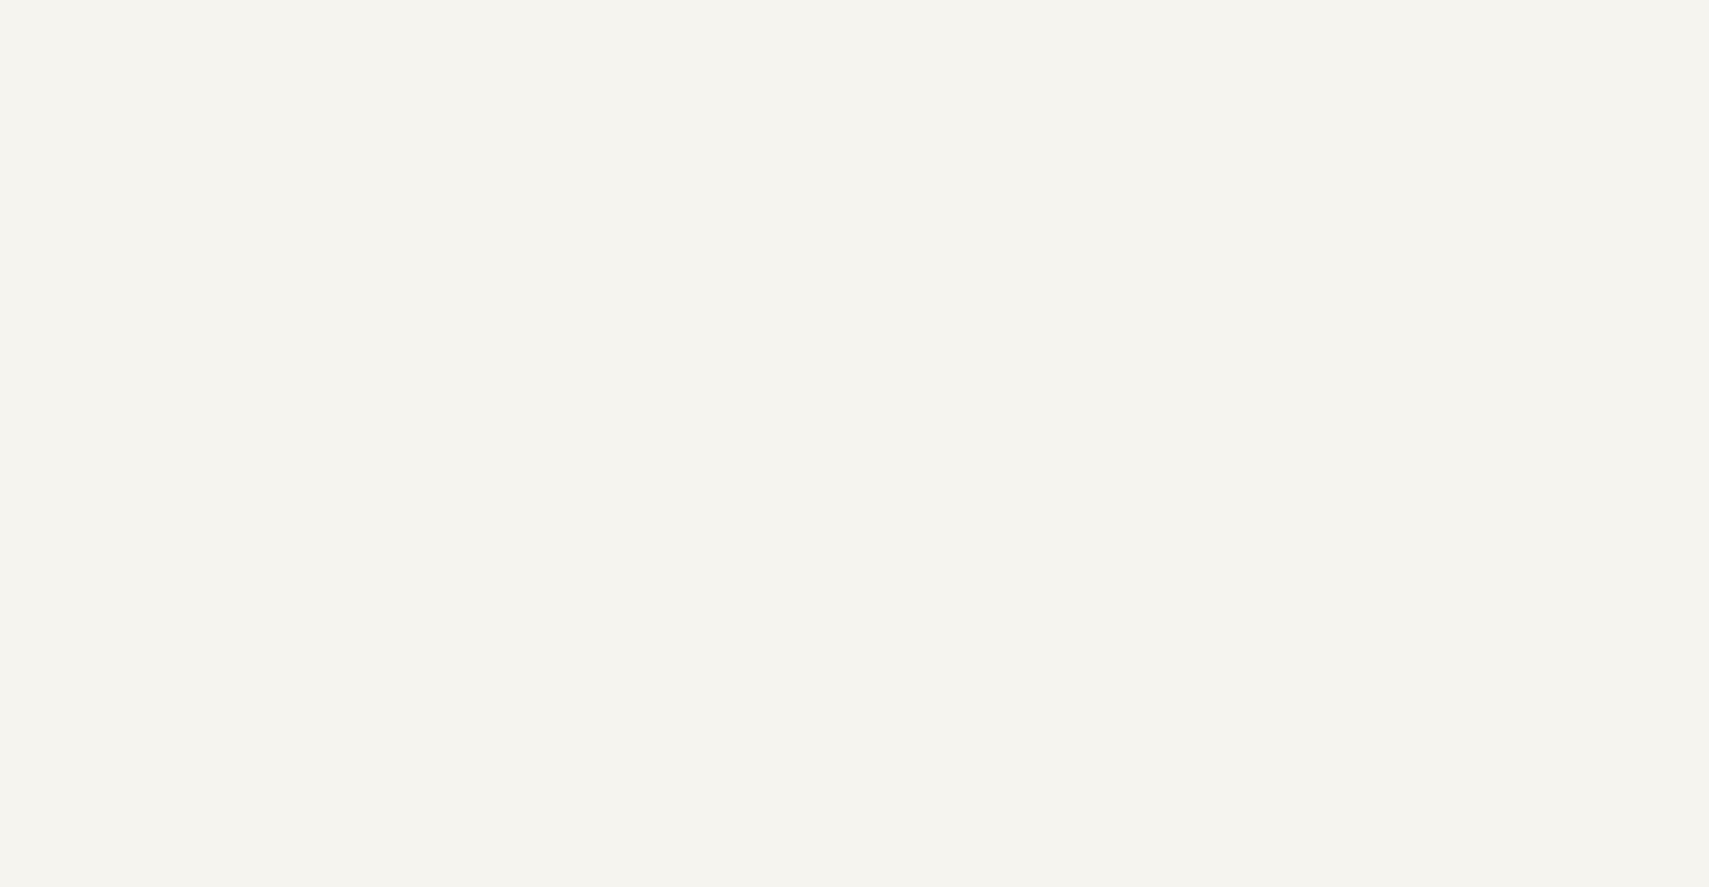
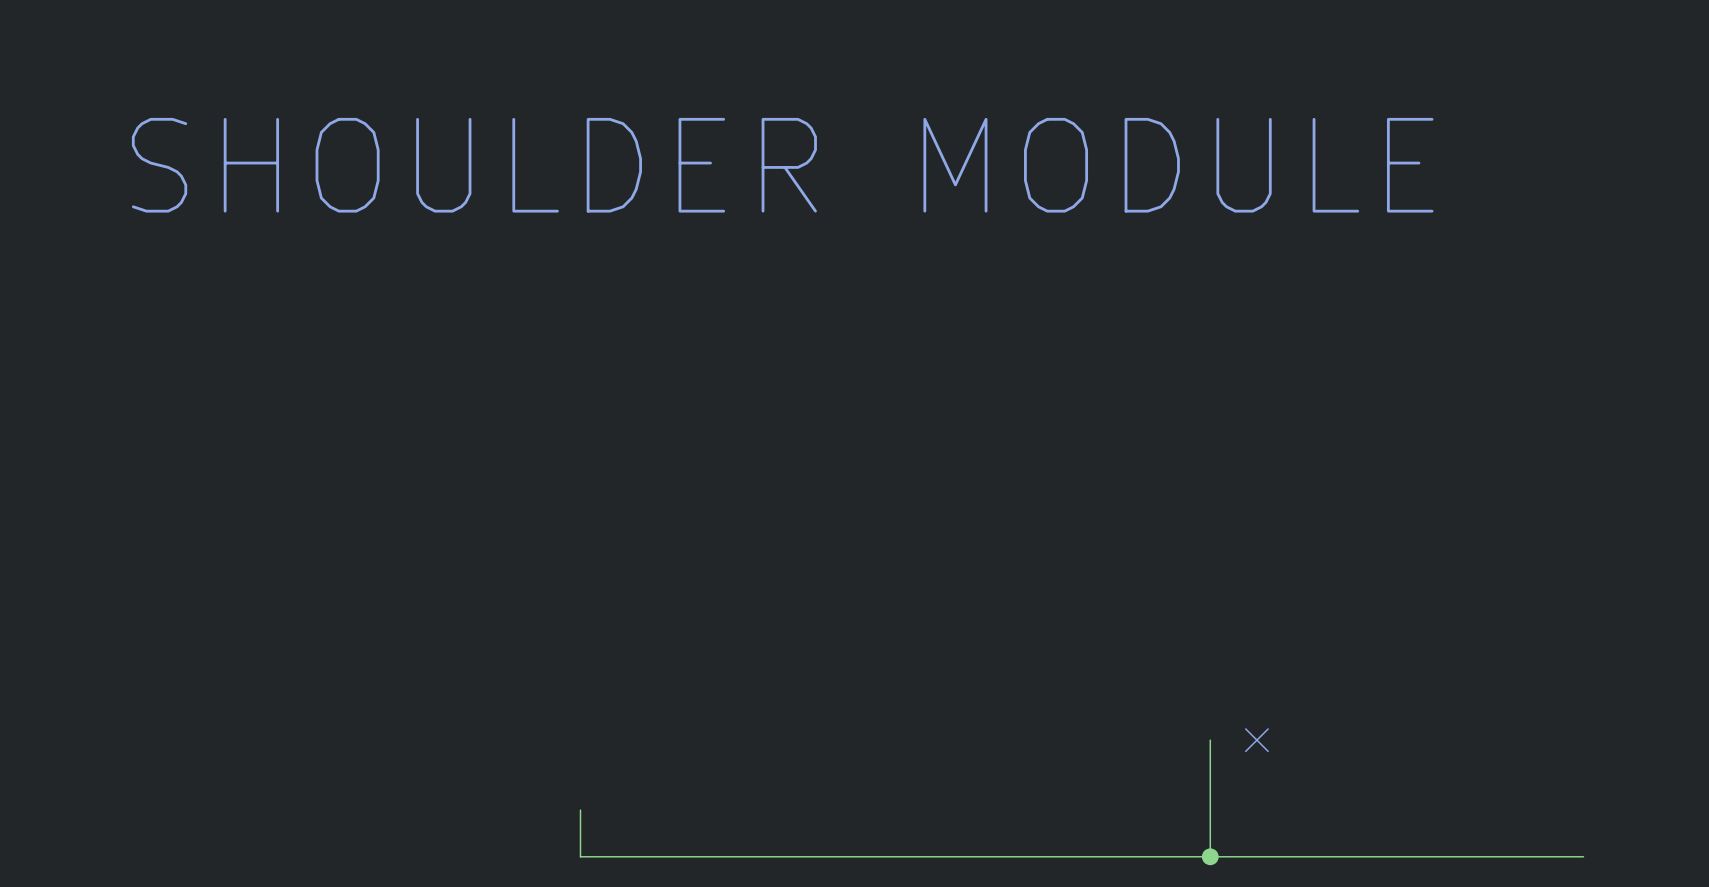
text: none -> SHOULDER MODULE (782, 165)
wire: none -> (1210, 740) (1210, 856)
no-connect mark: none -> (1256, 740)
wire: none -> (580, 810) (580, 856) (1583, 856)
junction: none -> (1210, 856)

